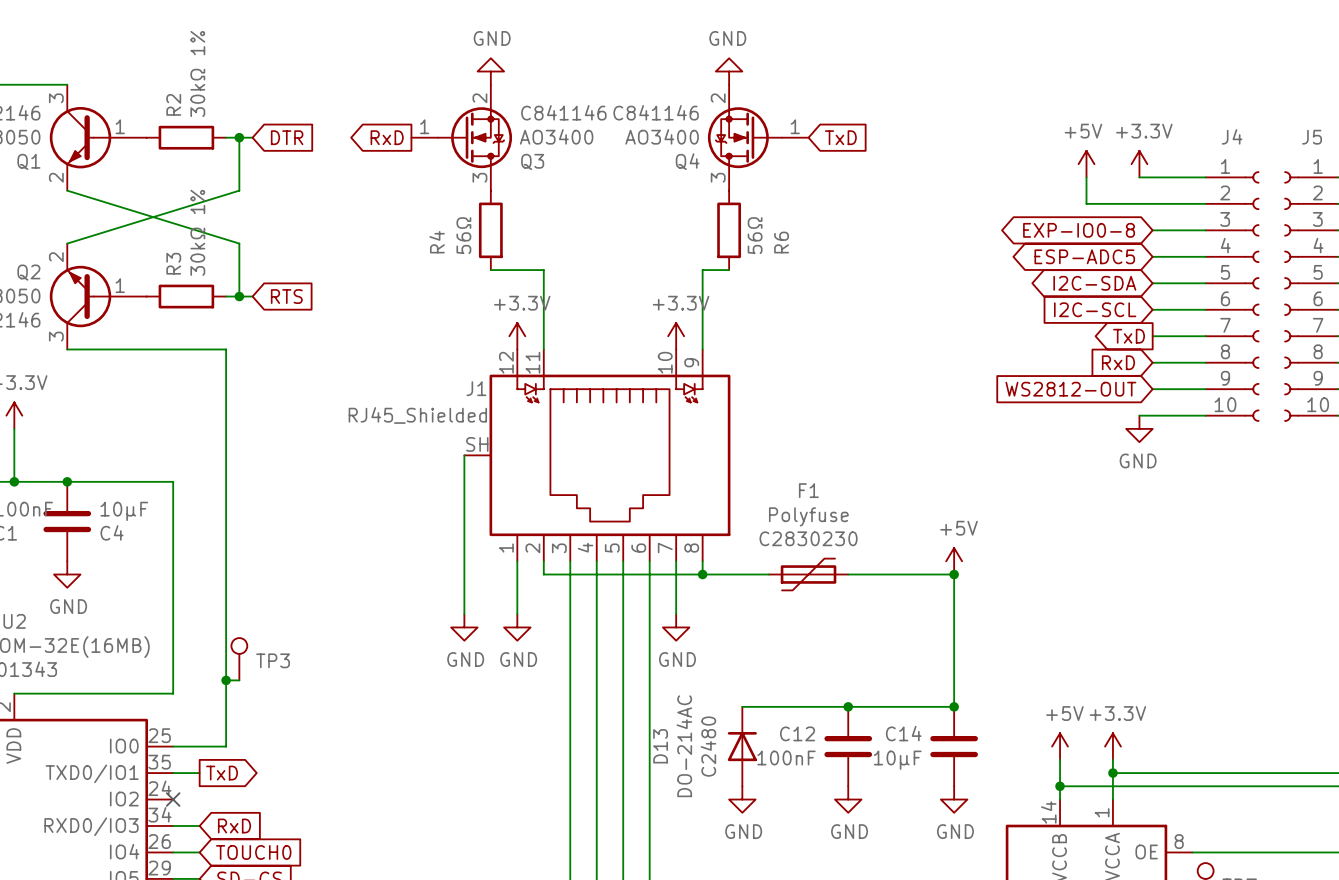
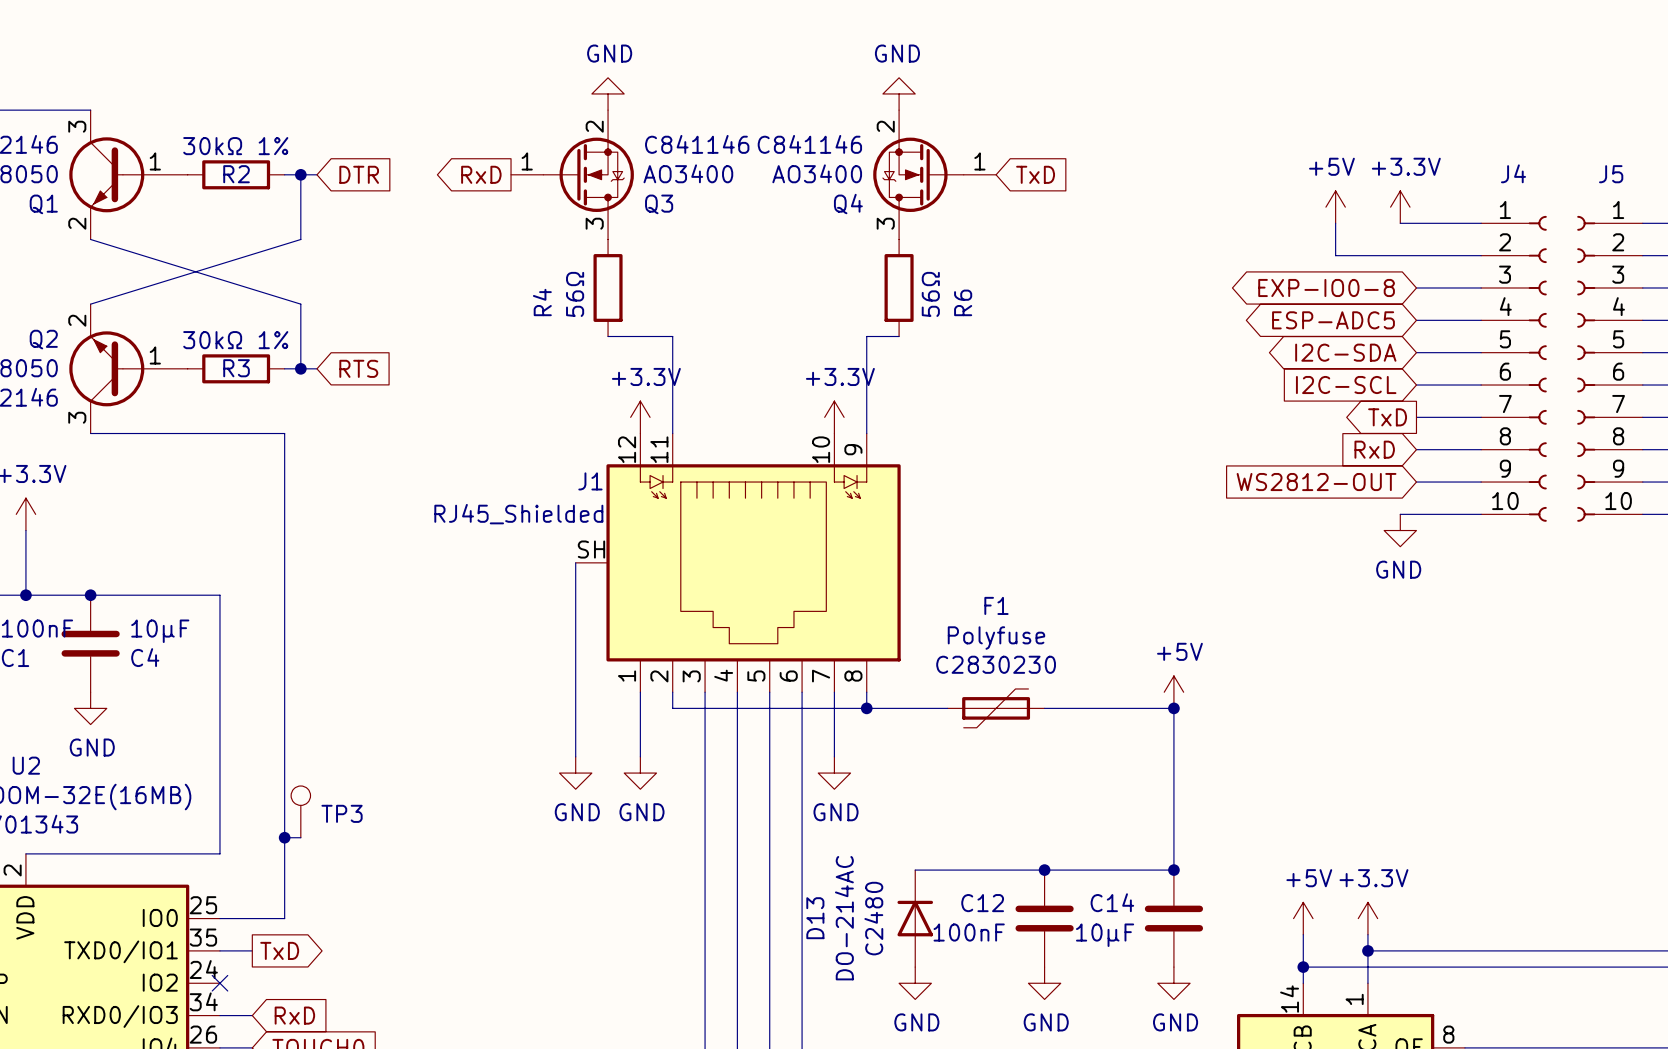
R2 value rotation: 0° (197, 74) -> 90° clockwise (235, 146)
R2 name rotation: 0° (173, 104) -> 90° clockwise (236, 174)
R2 name position: R2 (173, 104) -> R2 (236, 174)
R3 value rotation: 0° (197, 232) -> 90° clockwise (235, 340)
R3 name rotation: 0° (173, 263) -> 90° clockwise (236, 368)
R3 name position: R3 (173, 263) -> R3 (236, 368)

